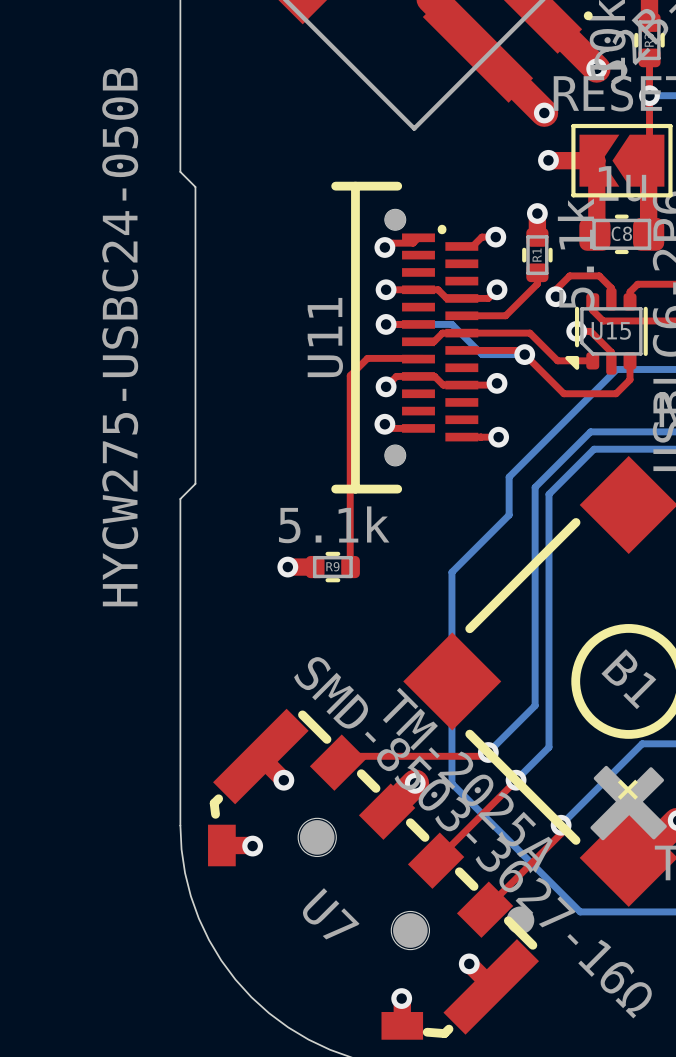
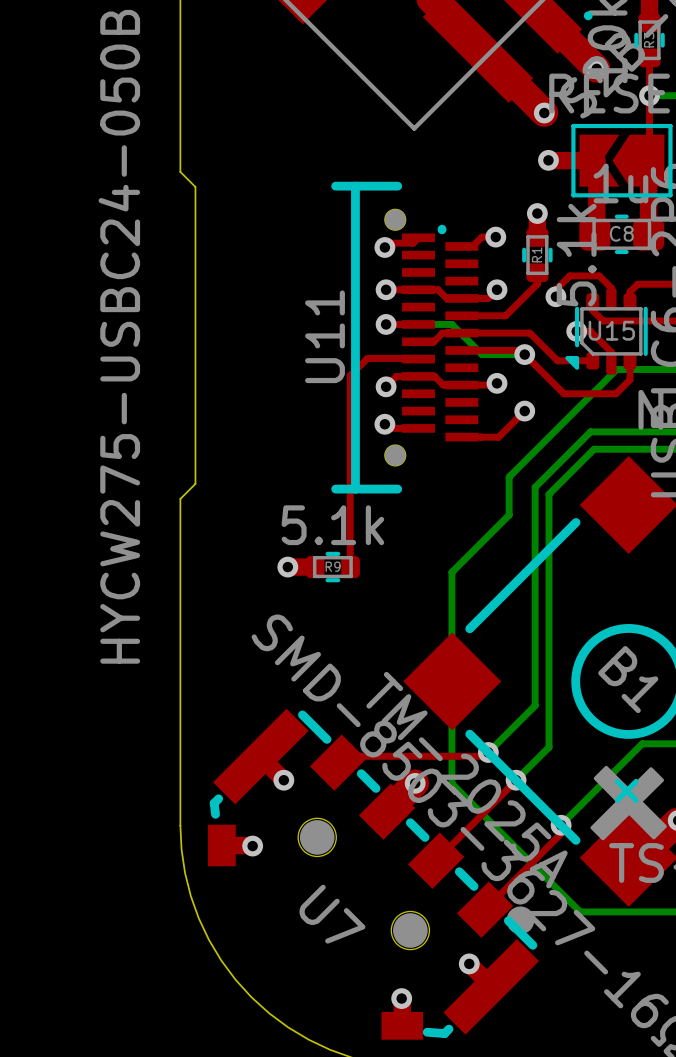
top track: none -> (524, 411) (498, 437)
via position: (498, 437) -> (524, 411)

